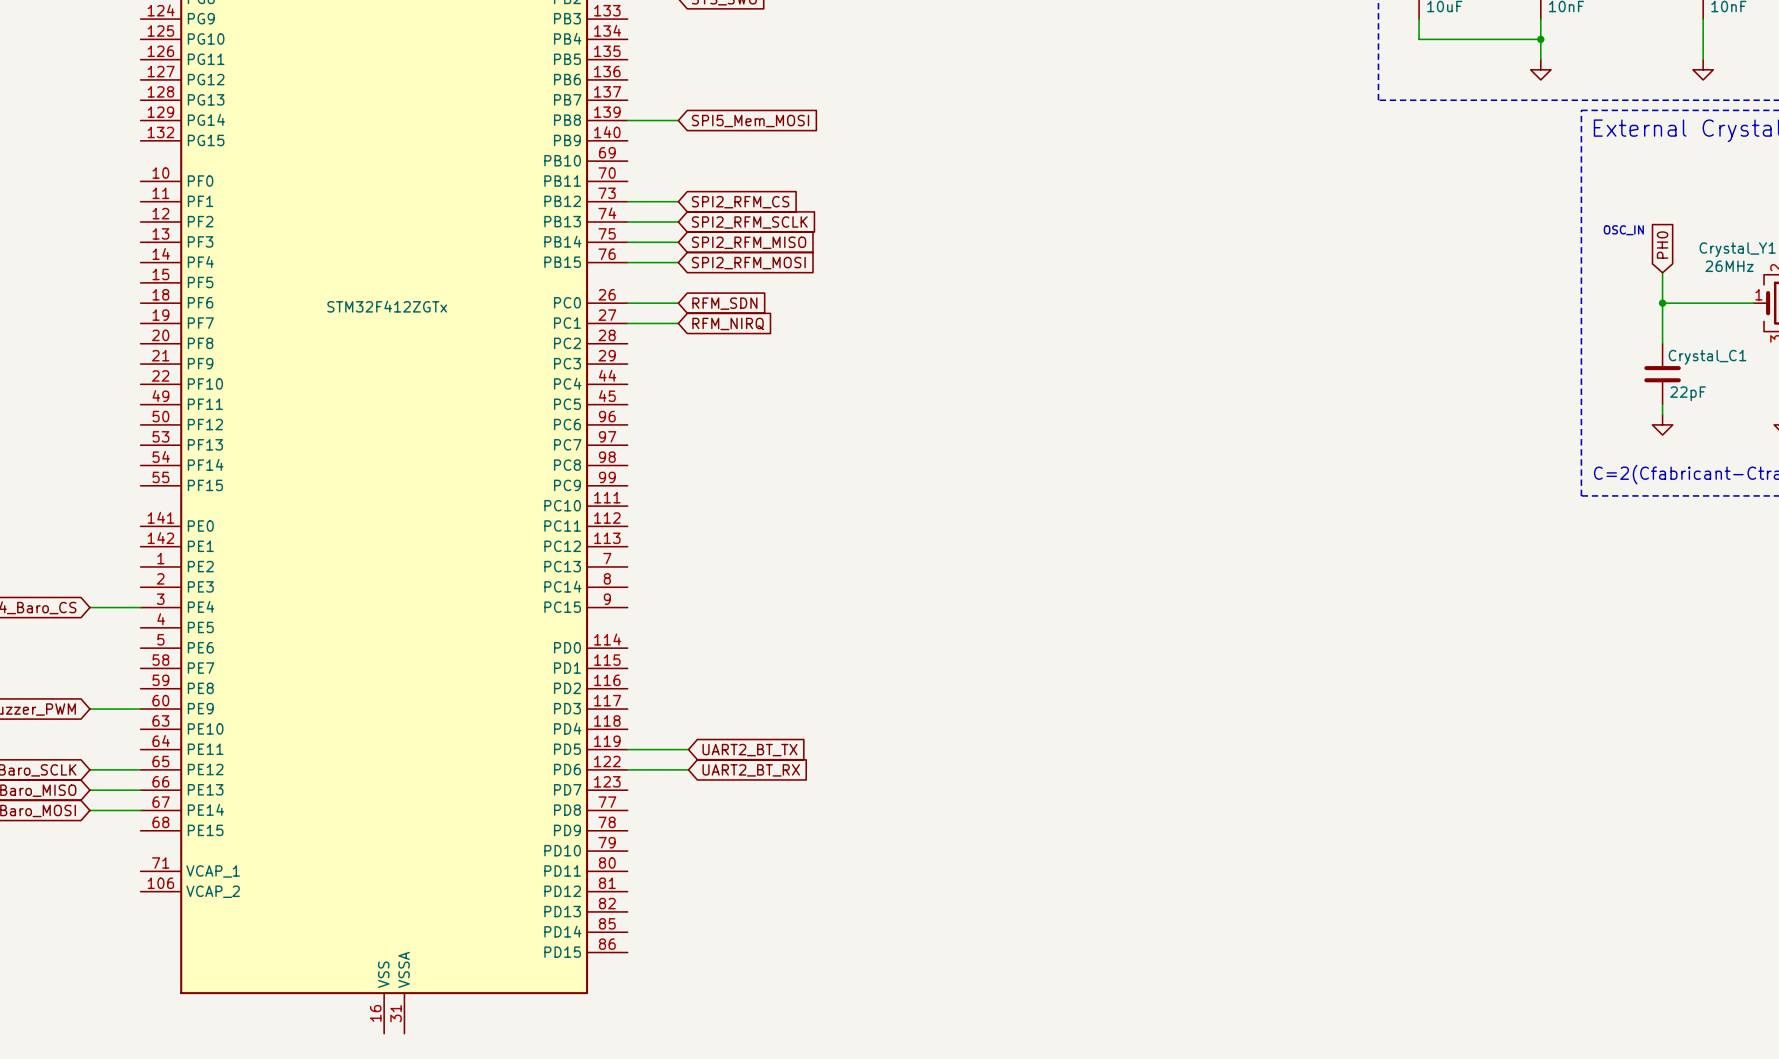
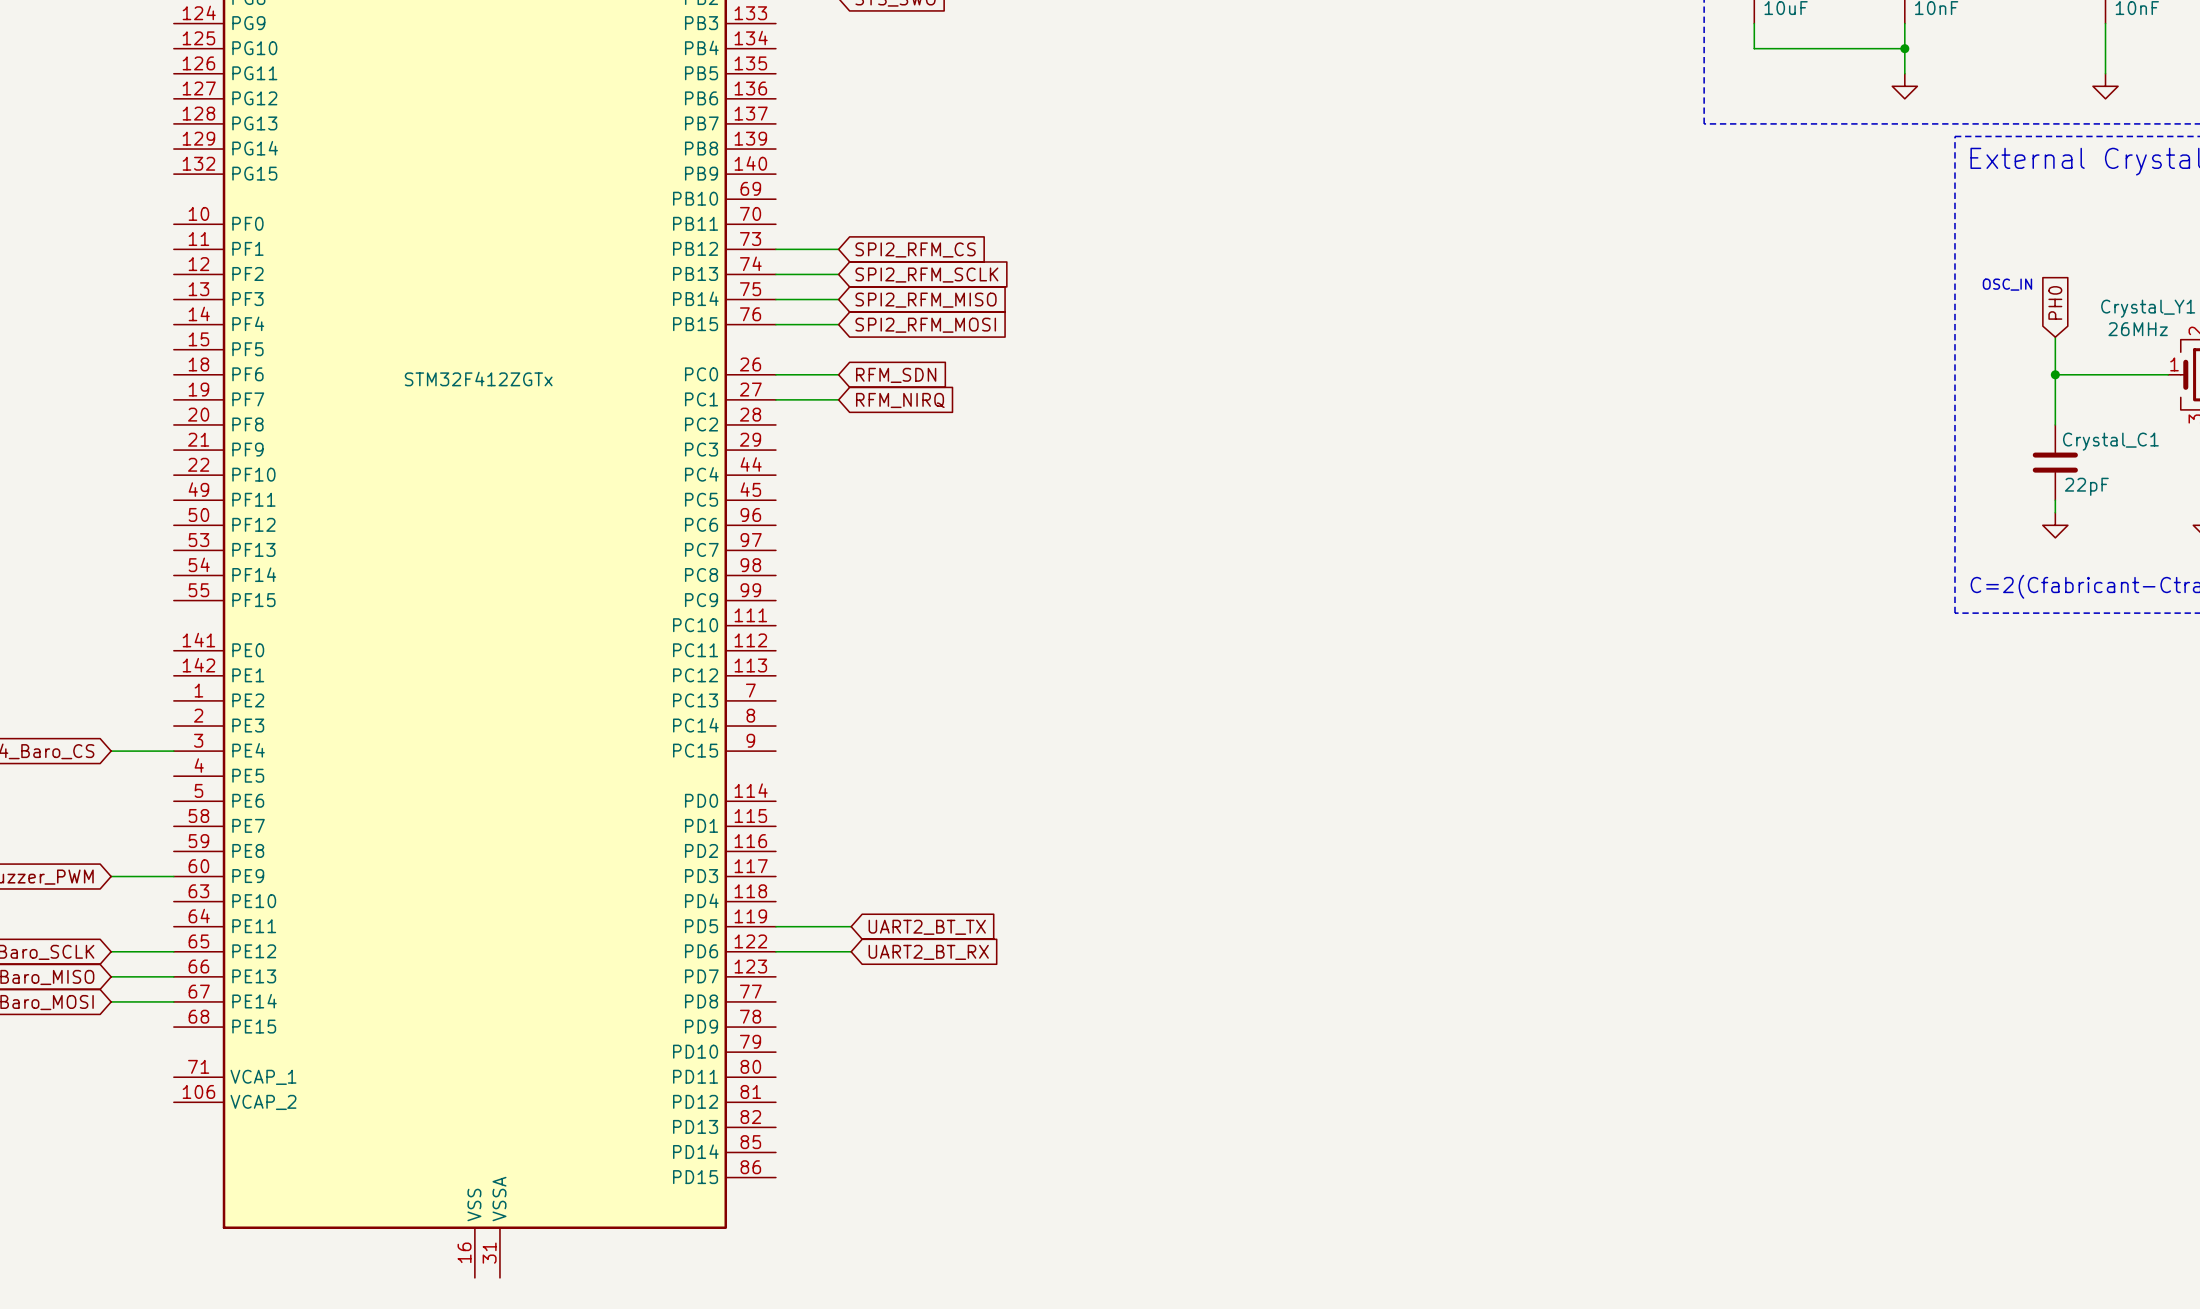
wire: (627, 120) (678, 120) -> none
global label: SPI5_Mem_MOSI (750, 121) -> none

